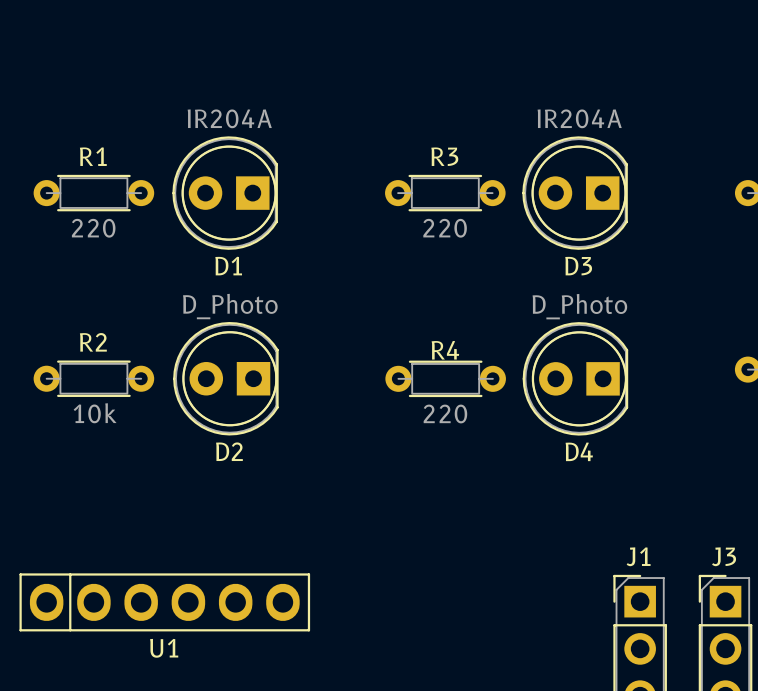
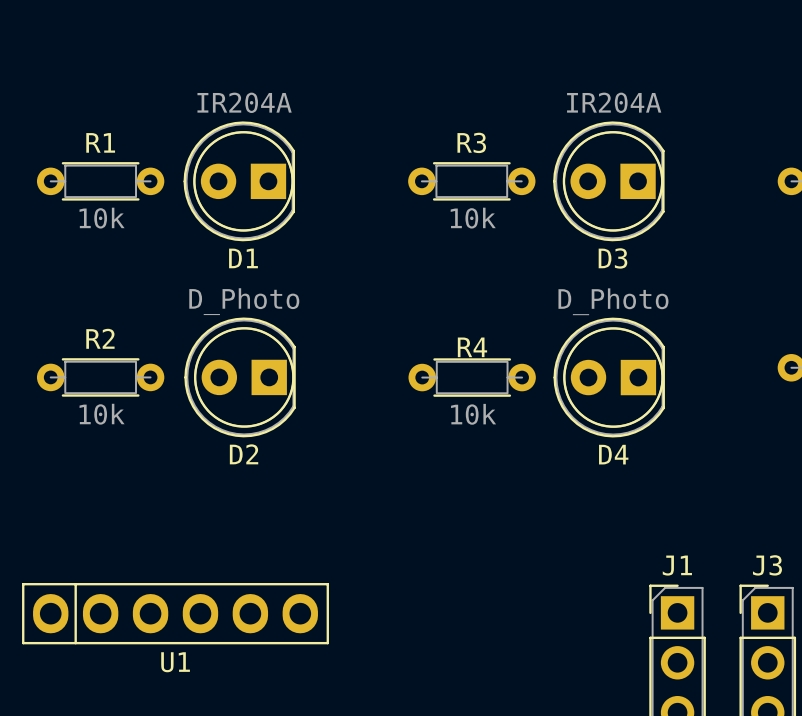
R1 value: 220 (93, 228) -> 10k (102, 218)
R3 value: 220 (445, 228) -> 10k (473, 218)
R4 value: 220 (445, 413) -> 10k (473, 414)

